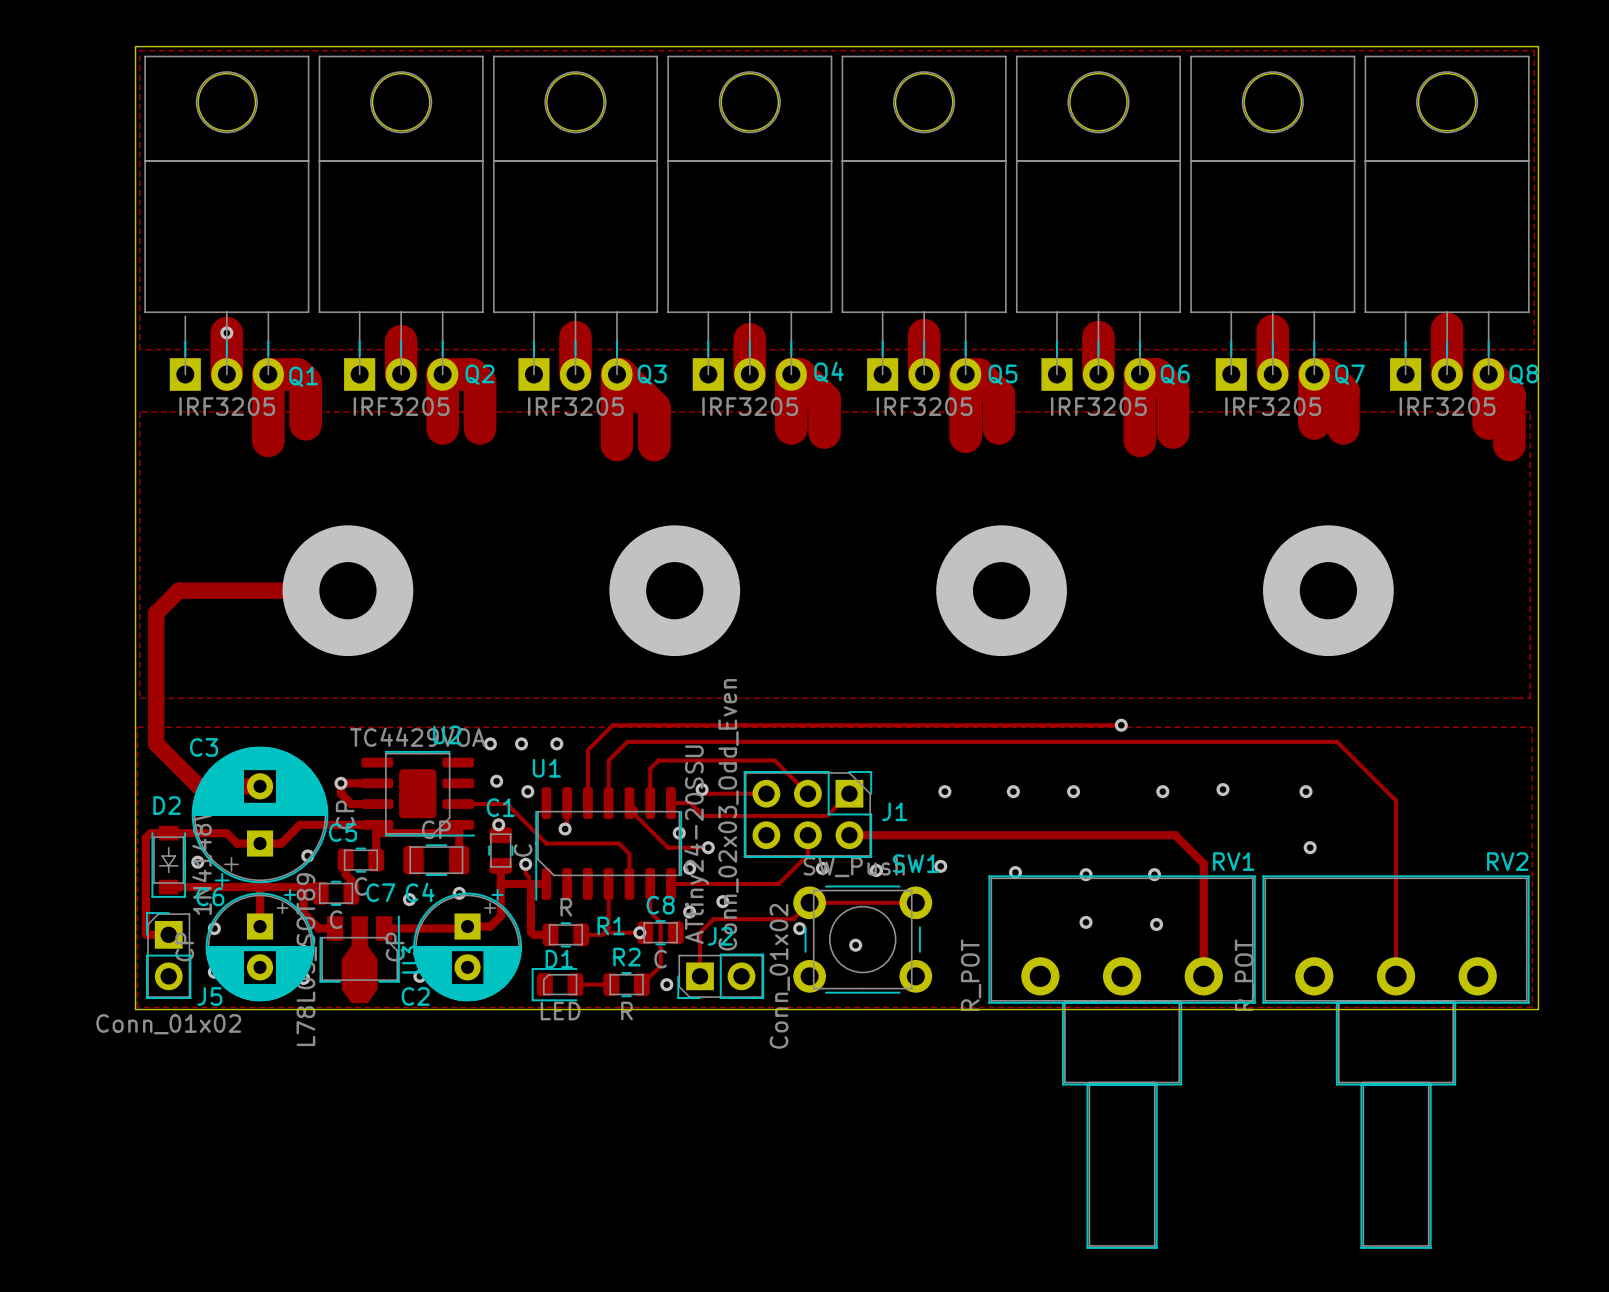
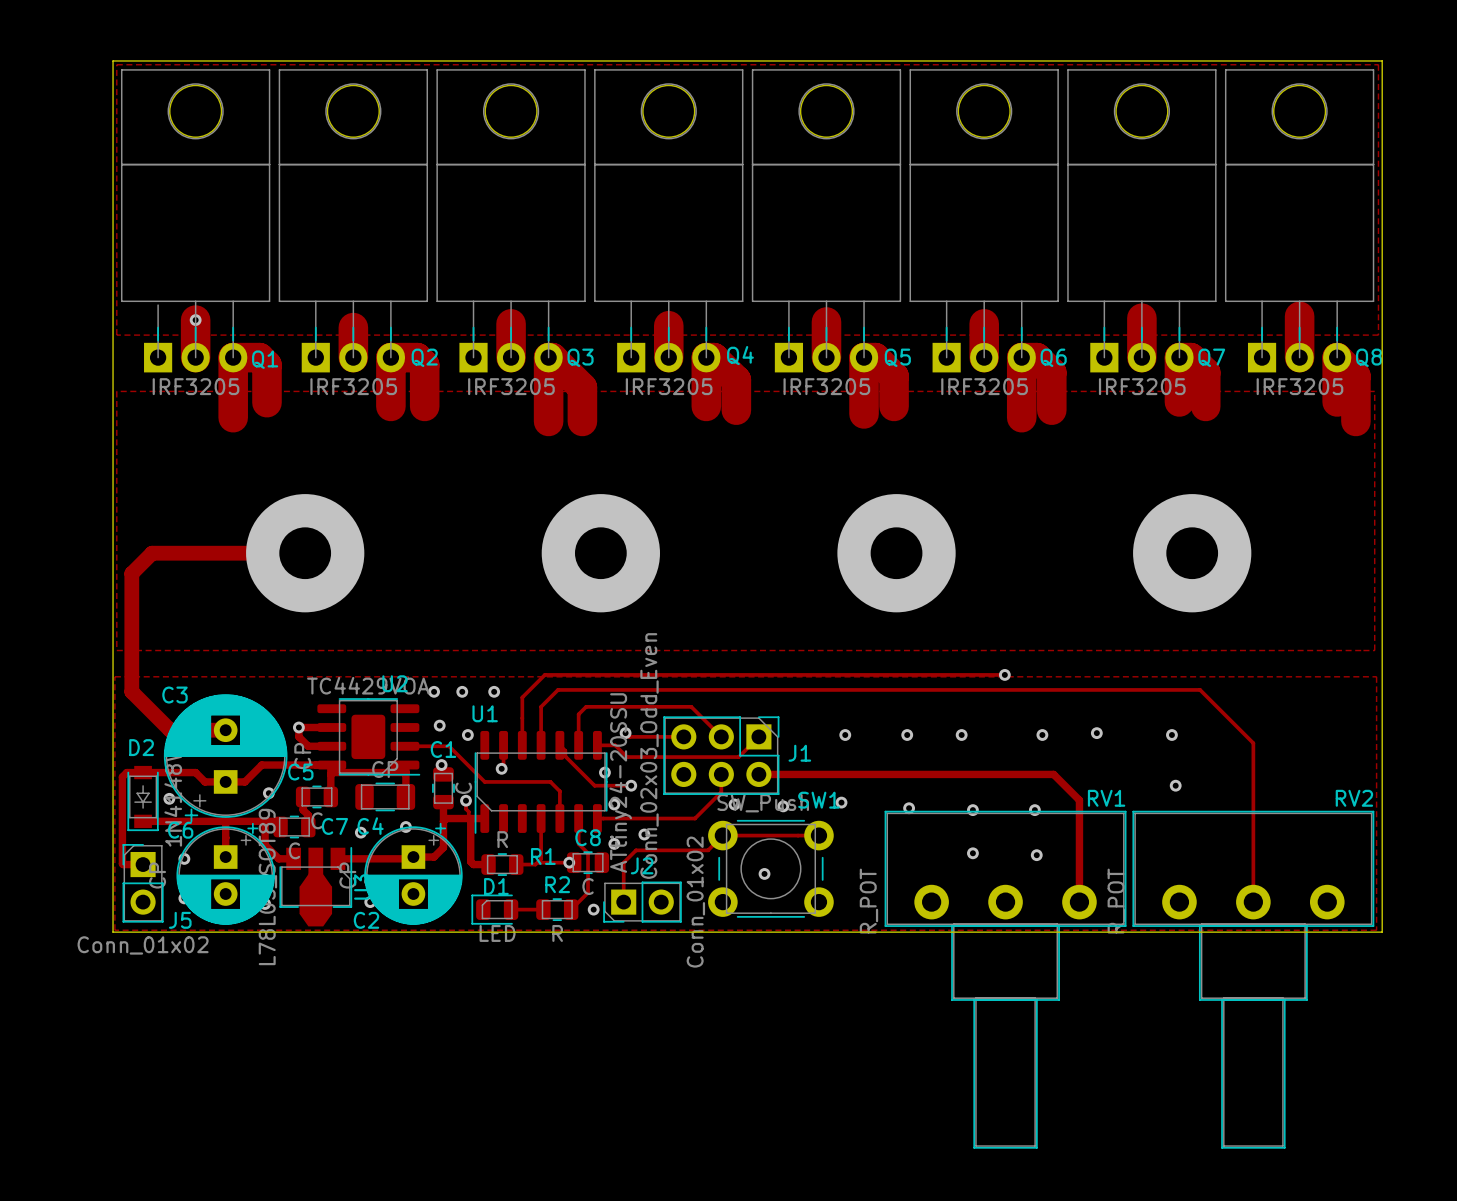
via: (799, 928) -> none

